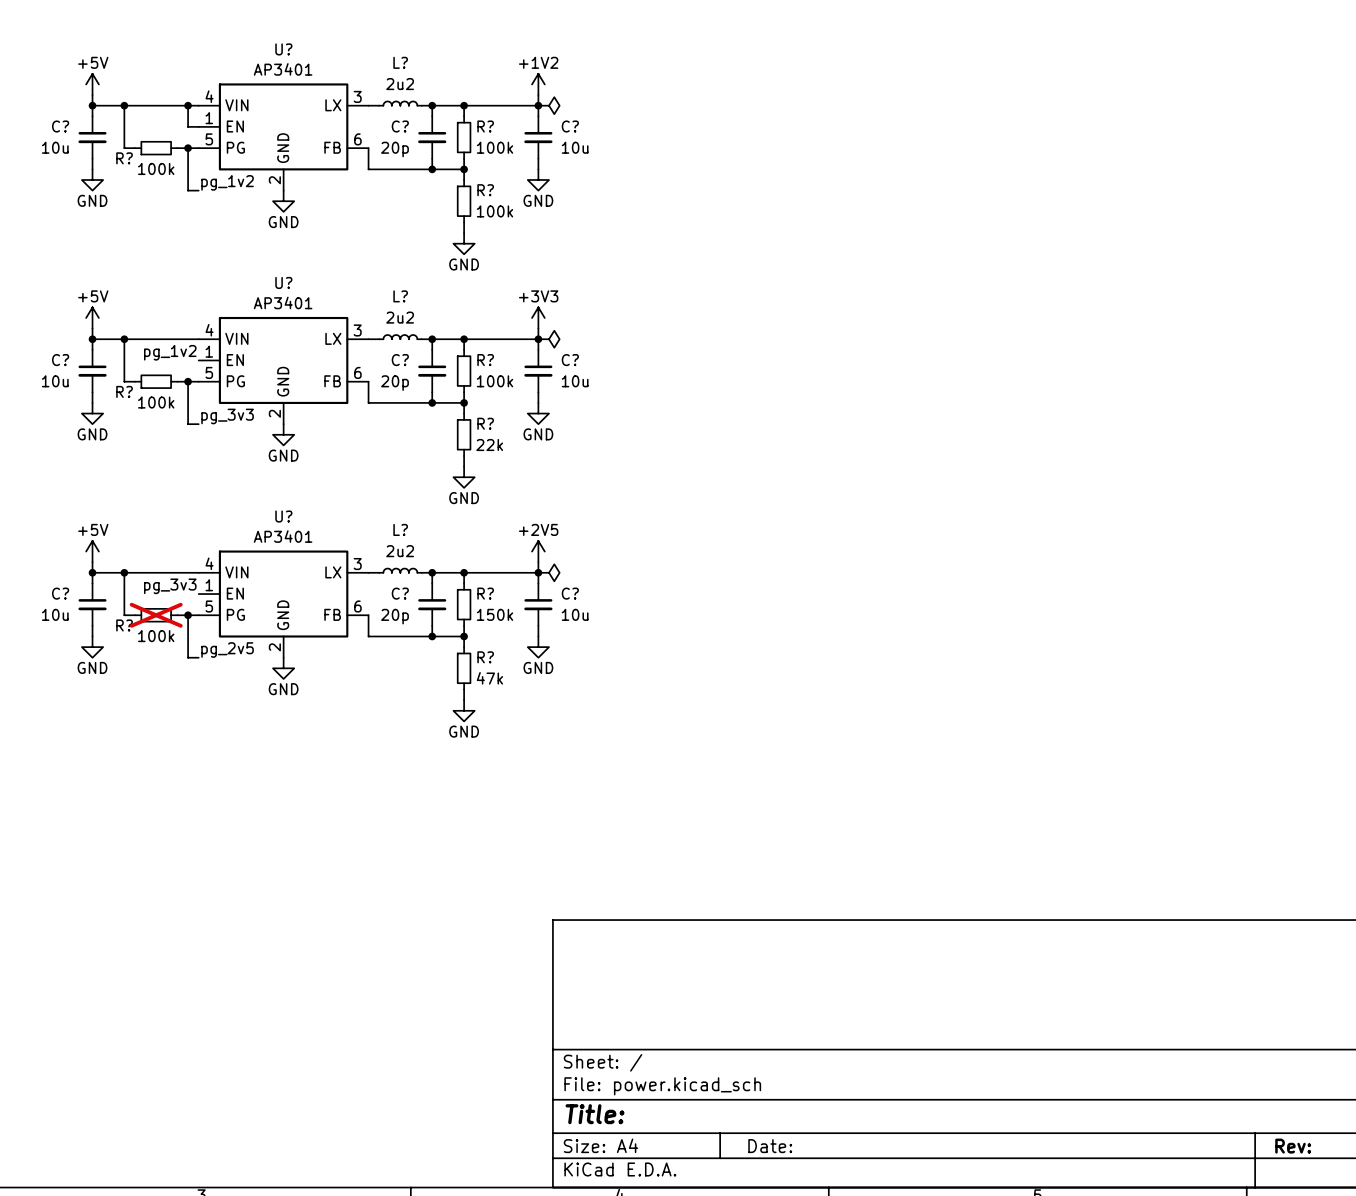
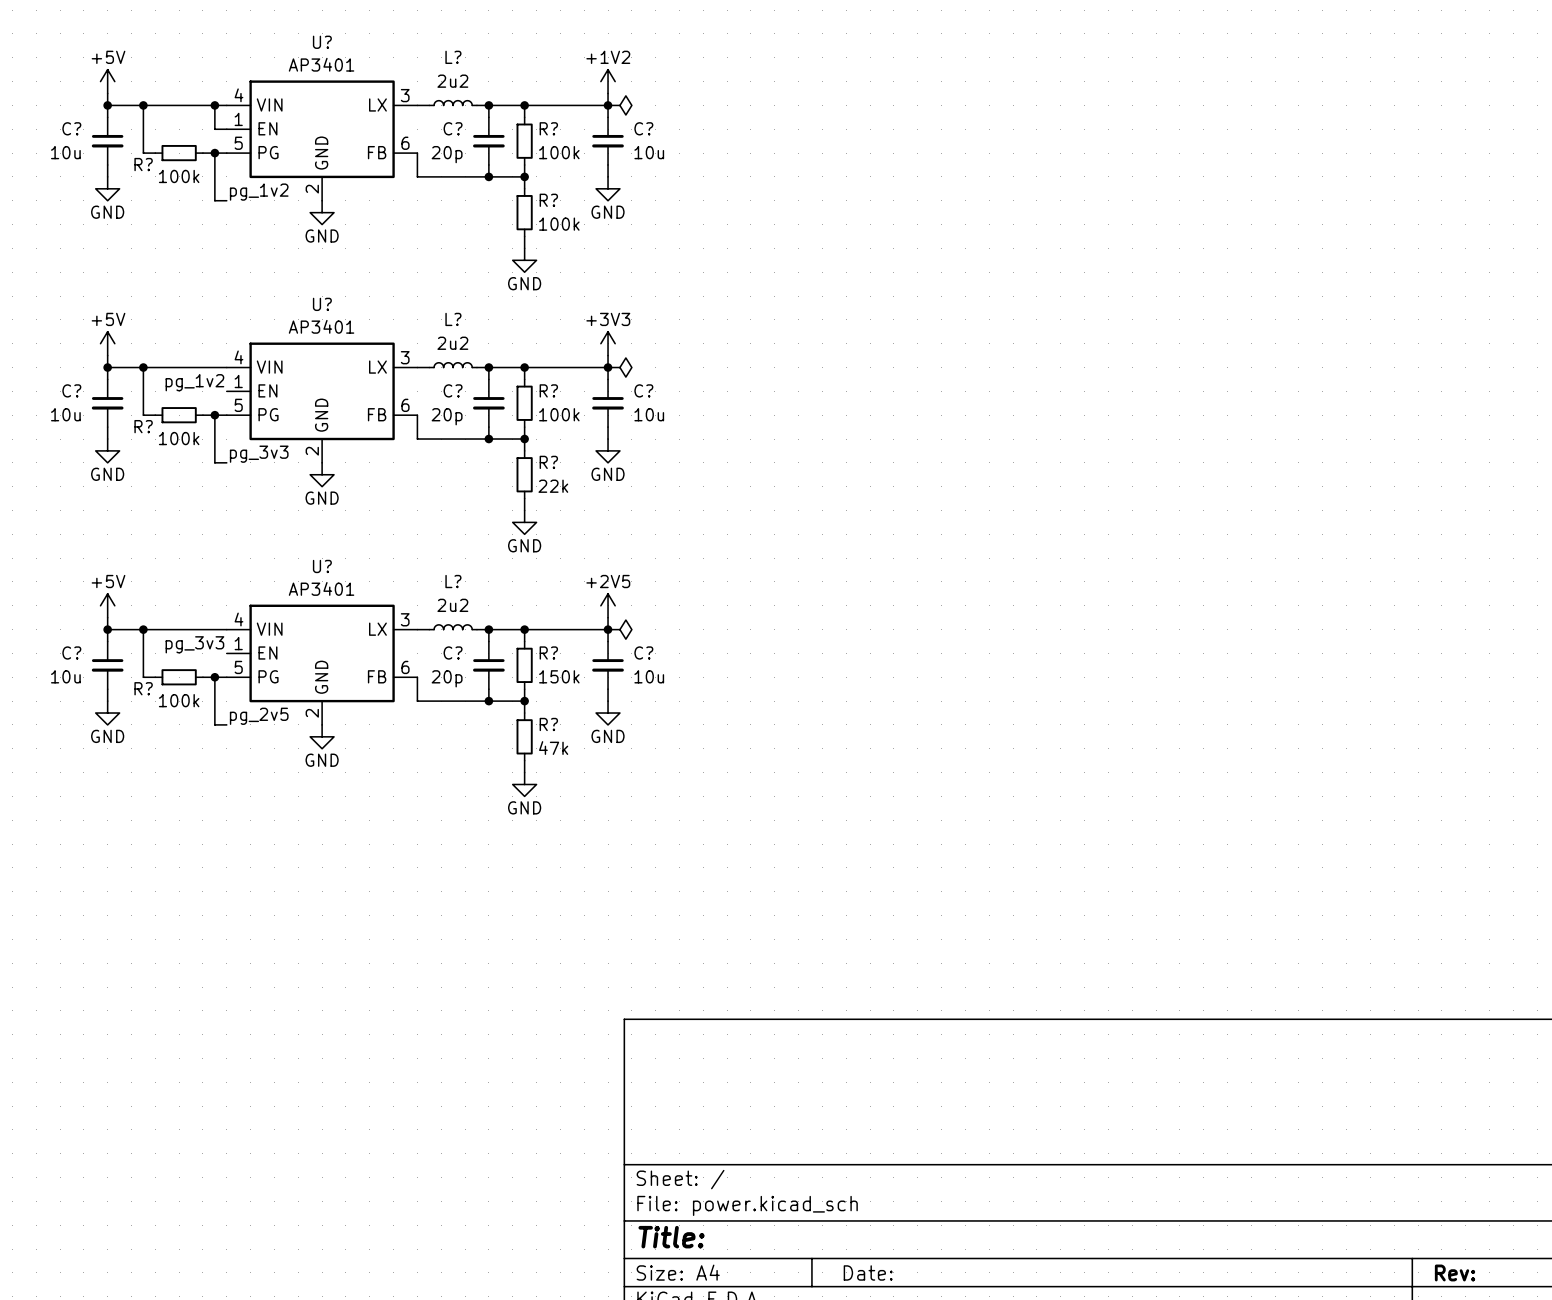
R? do-not-place cross: (156, 615) -> none

